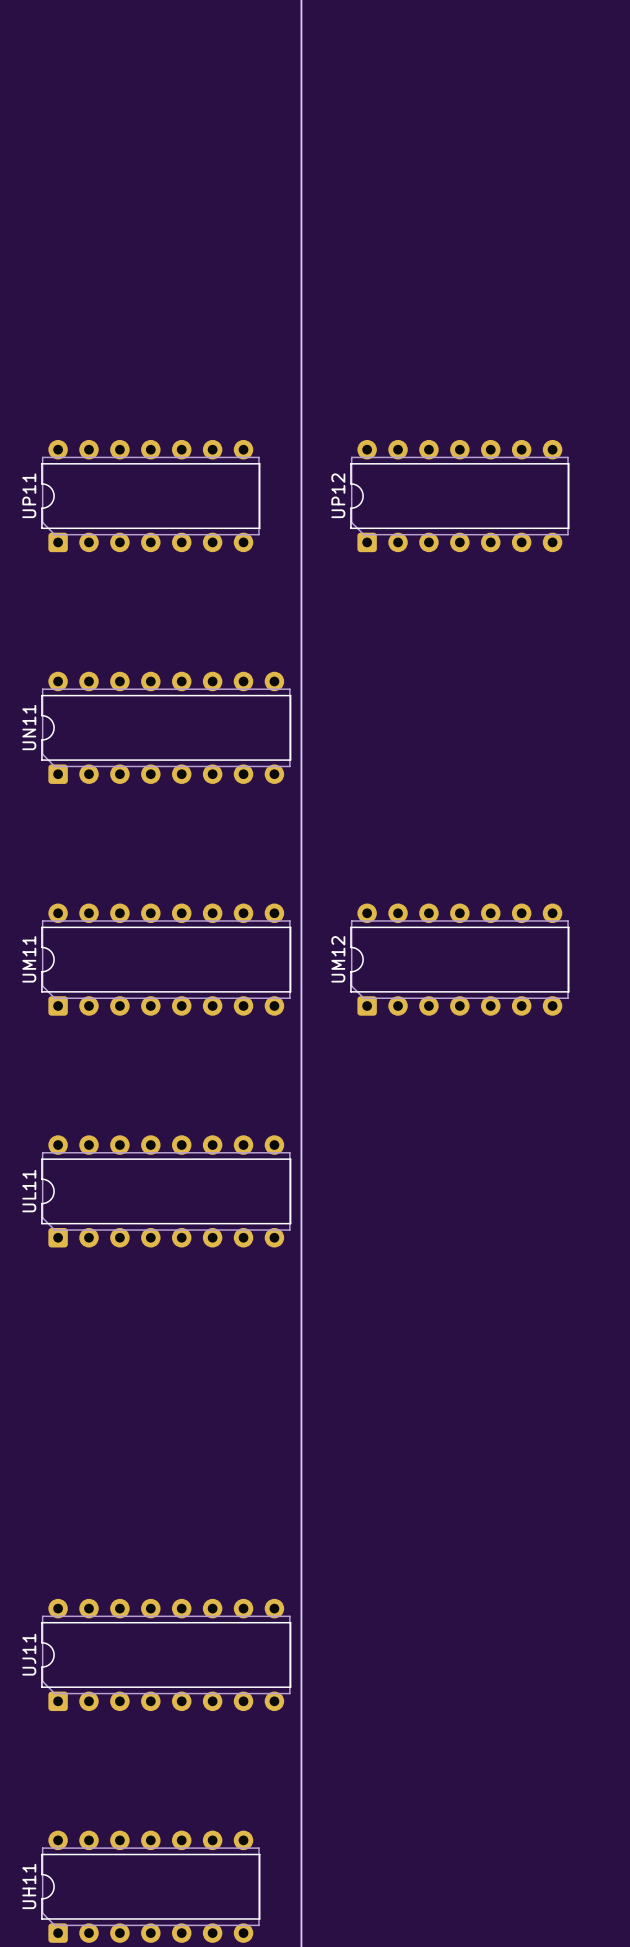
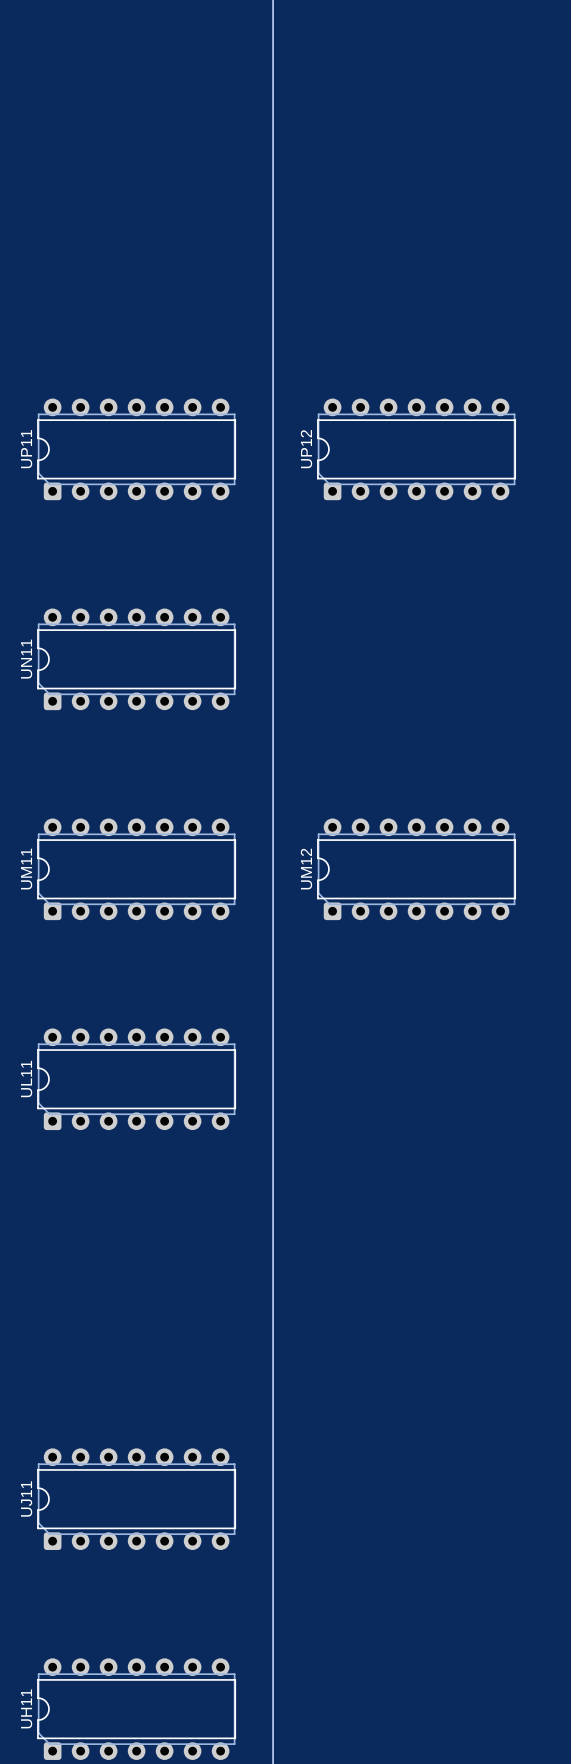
UN11 footprint: [41, 671, 292, 784] -> [37, 608, 236, 711]
UM11 footprint: [41, 903, 292, 1016] -> [37, 818, 236, 921]
UL11 footprint: [41, 1135, 292, 1248] -> [37, 1028, 236, 1131]
UJ11 footprint: [41, 1598, 292, 1712] -> [37, 1448, 236, 1550]

